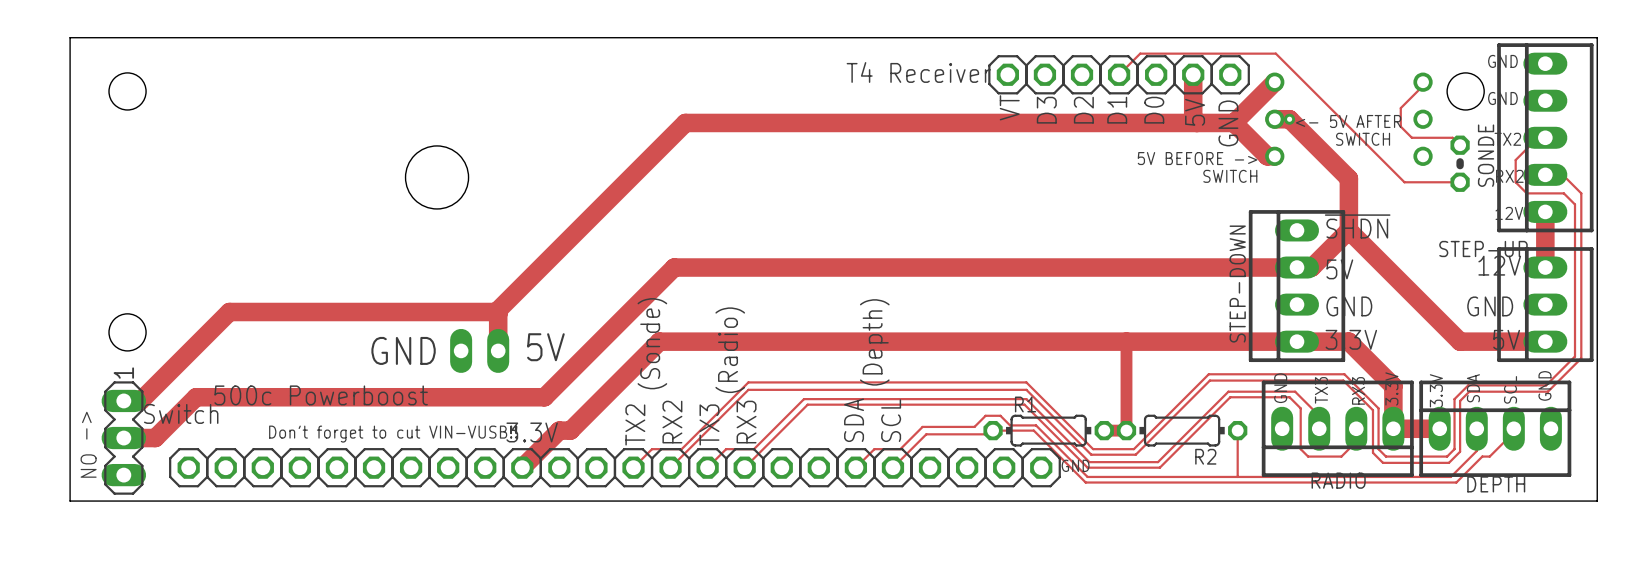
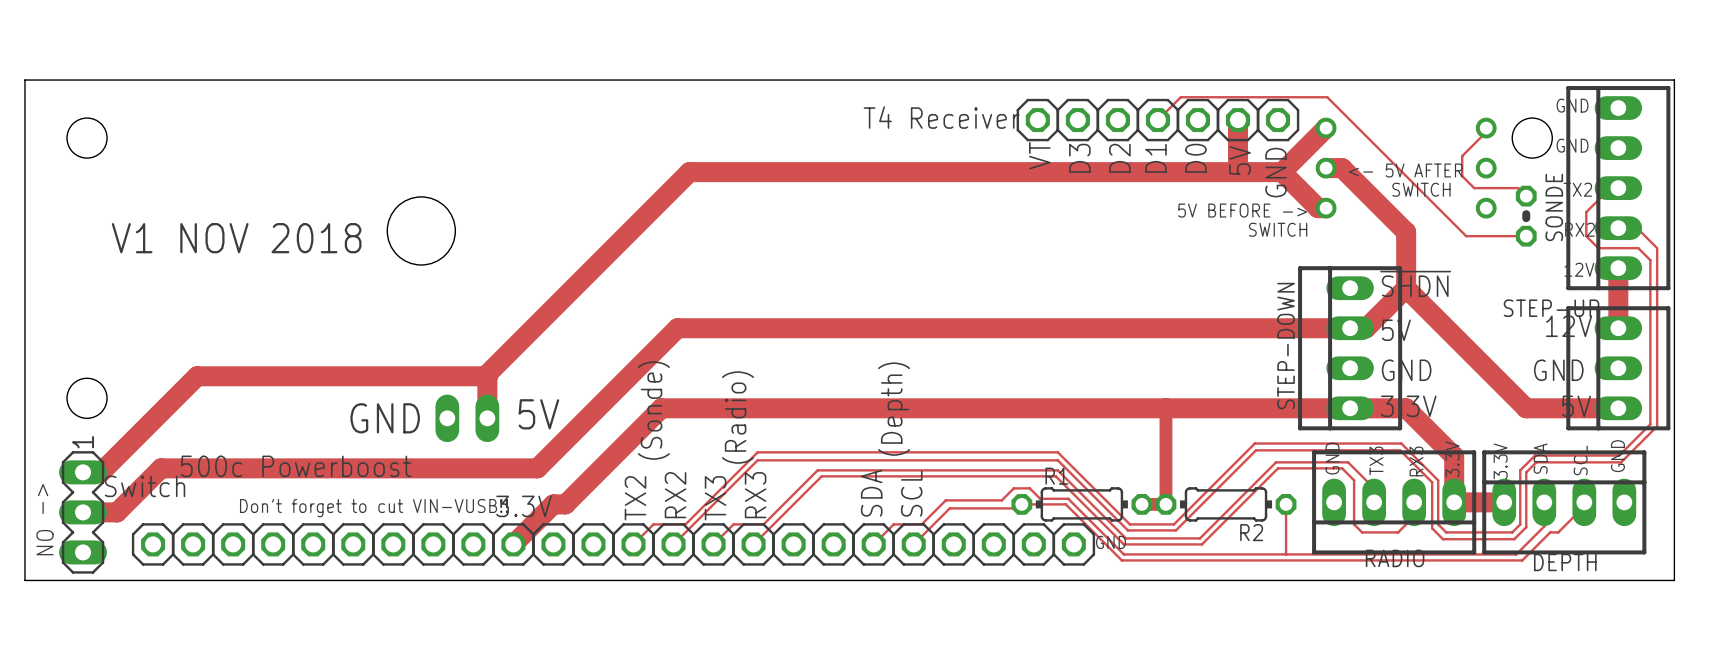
via: (1289, 119) -> none
text: none -> V1 NOV 2018 (236, 238)

